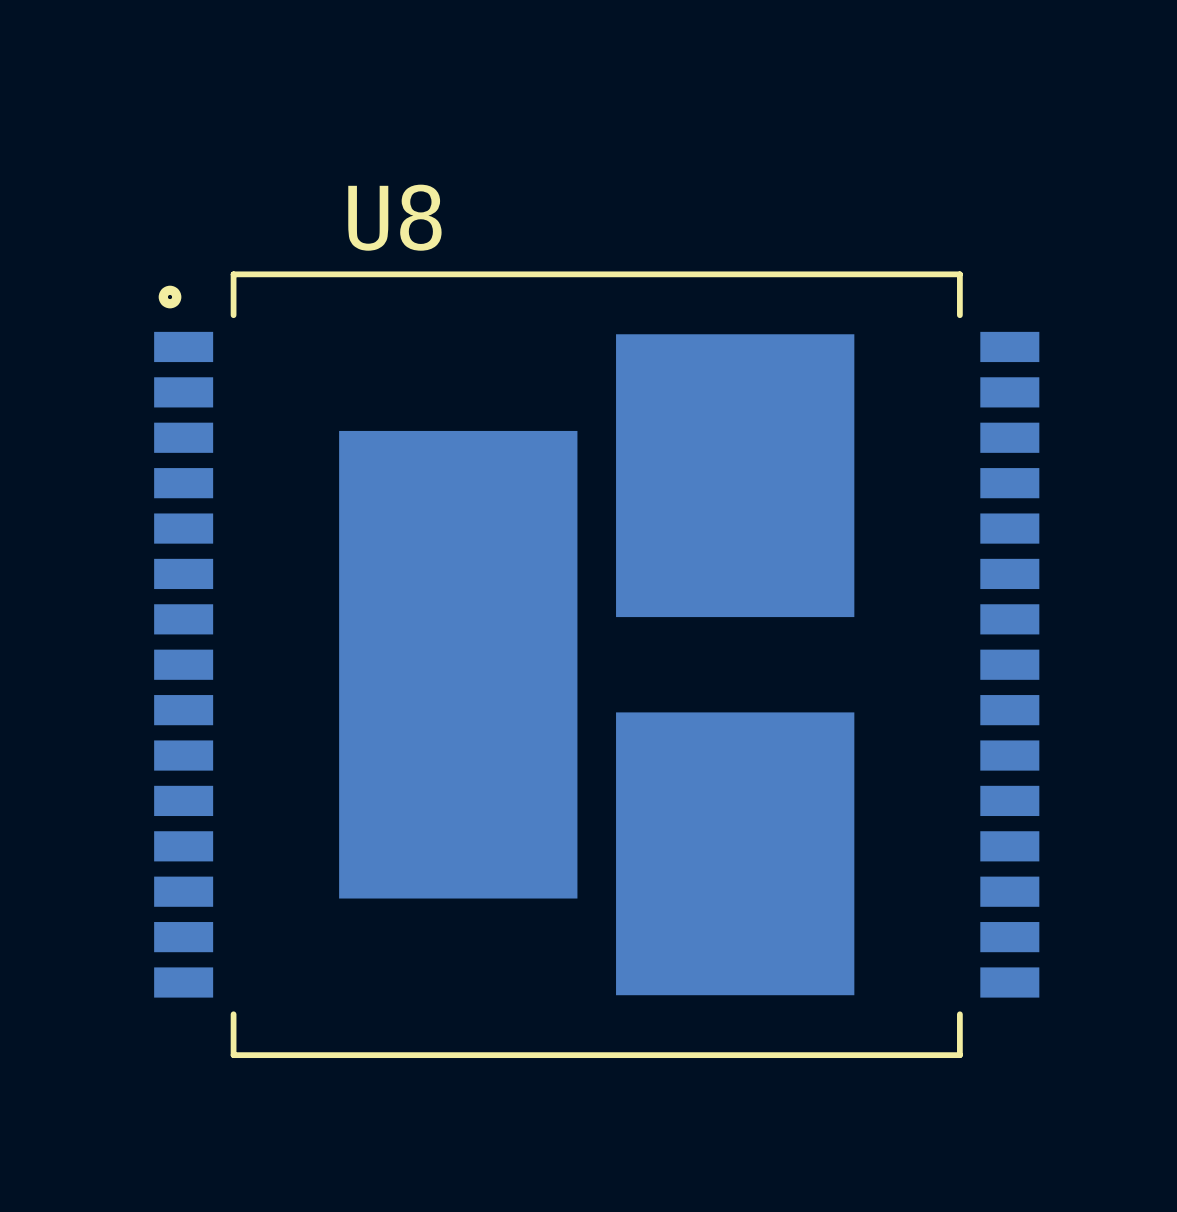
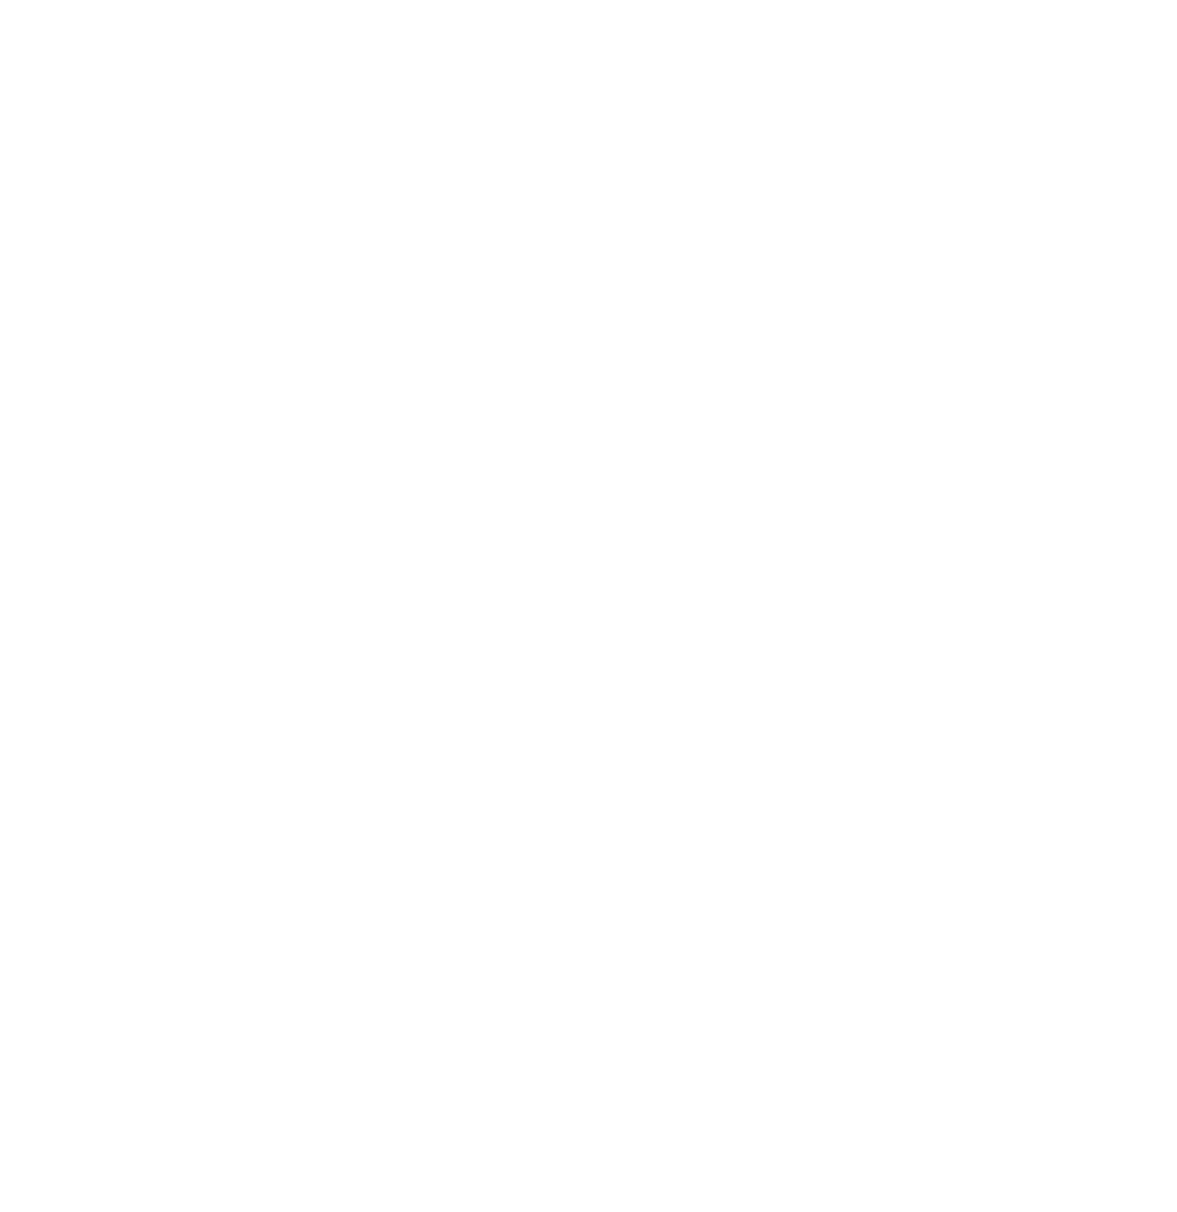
U8: (596, 664) -> none

